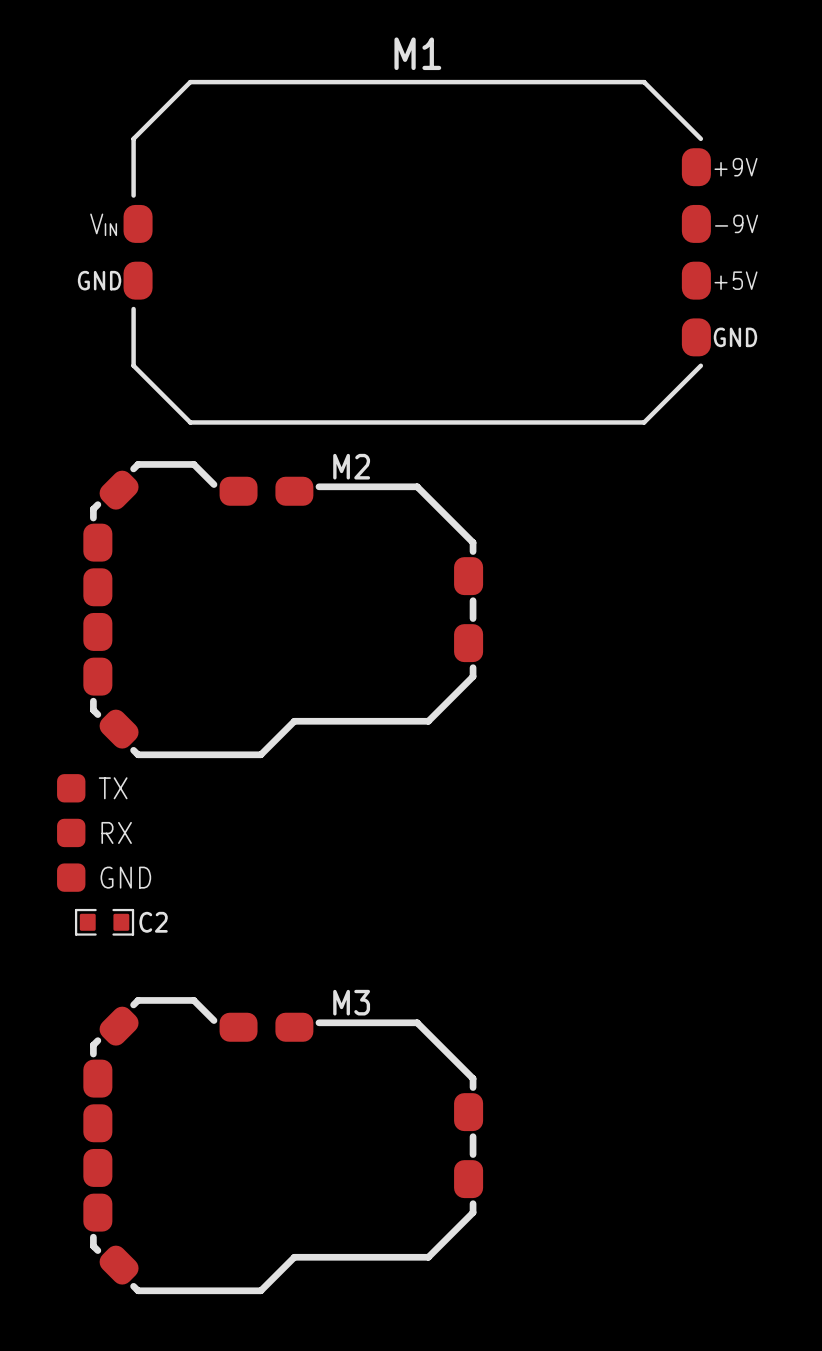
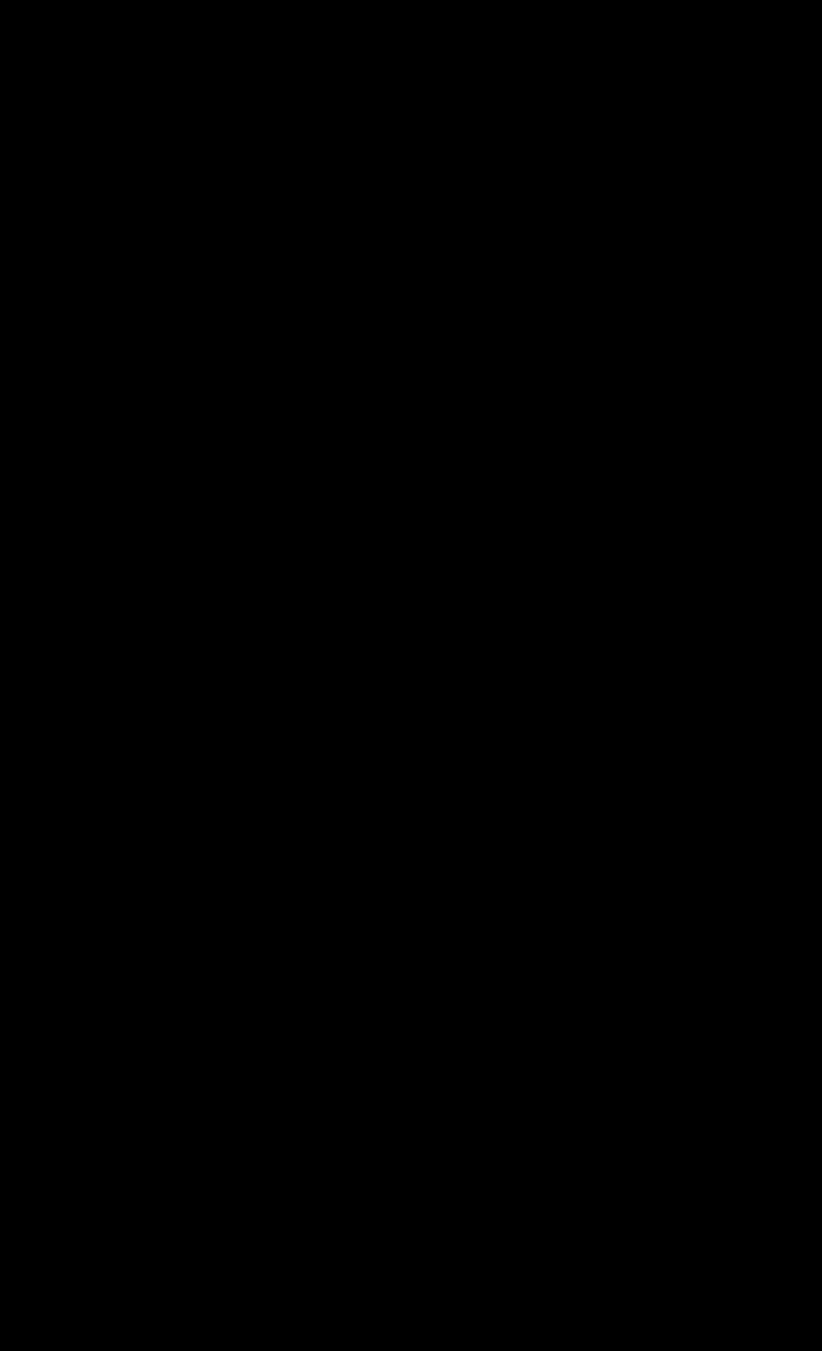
M1: (417, 252) -> none
M2: (283, 609) -> none
TX: (71, 788) -> none
RX: (71, 832) -> none
GND: (71, 877) -> none
C2: (104, 922) -> none
M3: (283, 1145) -> none

